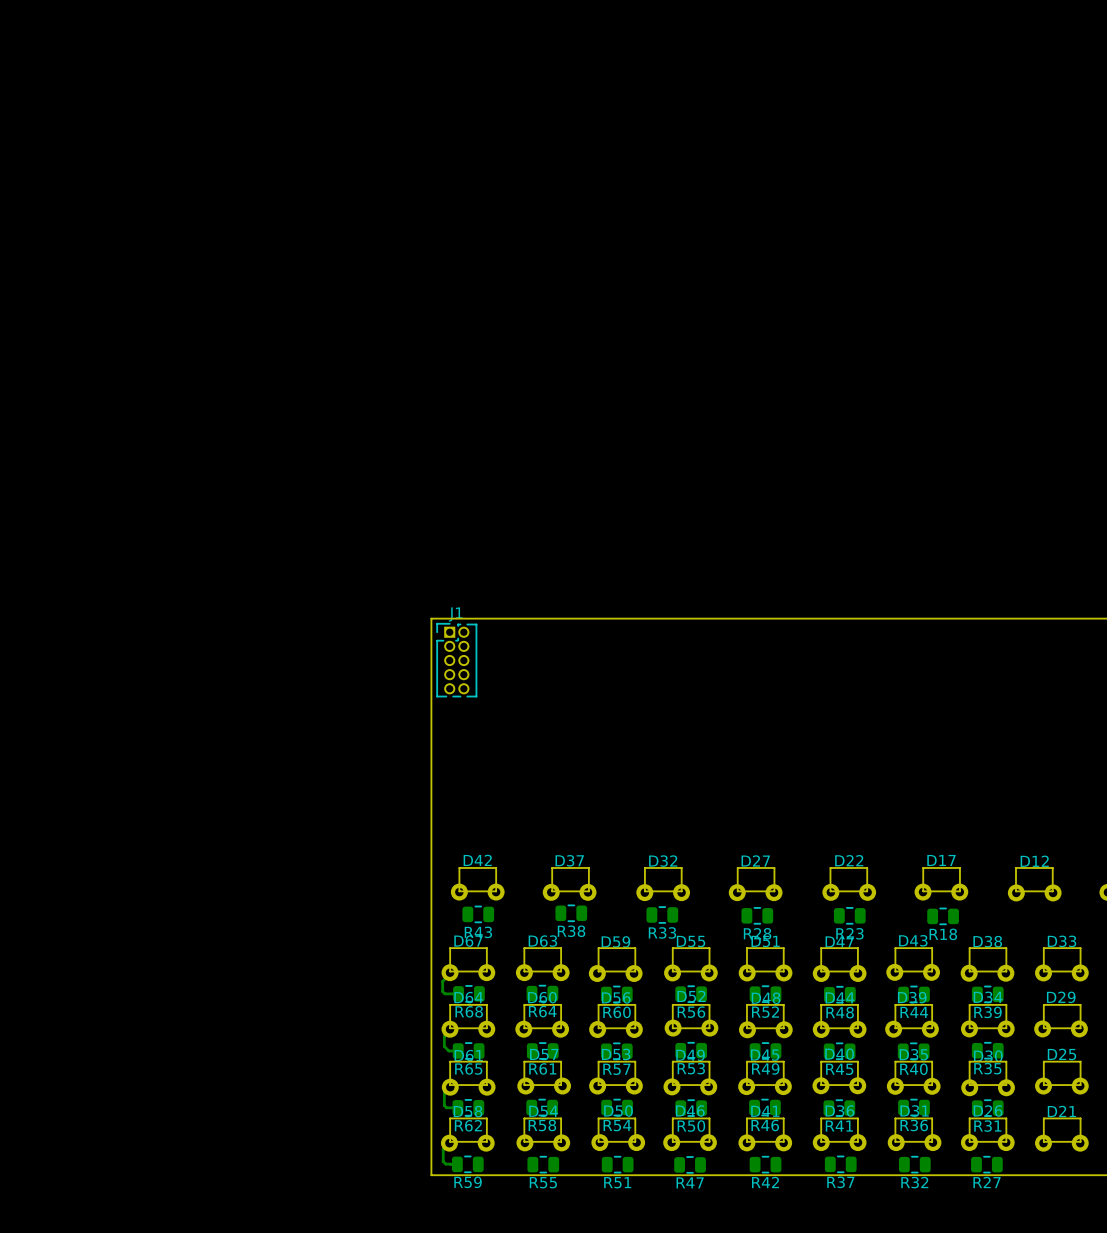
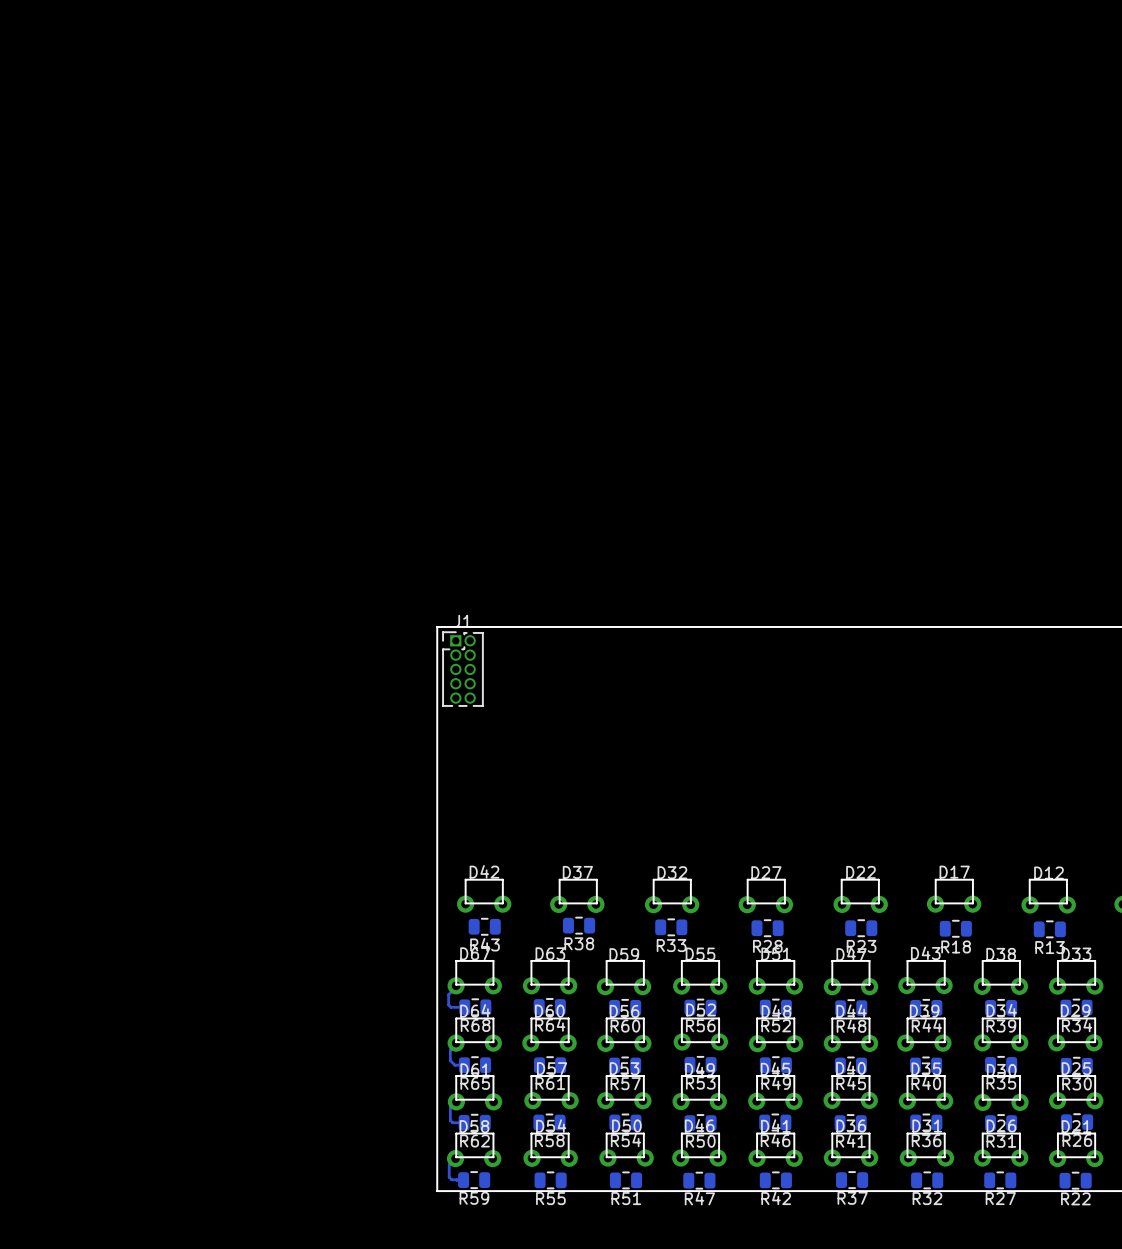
R13: none -> (1049, 929)
R34: none -> (1076, 1007)
R30: none -> (1076, 1065)
R26: none -> (1077, 1122)
R22: none -> (1075, 1180)

